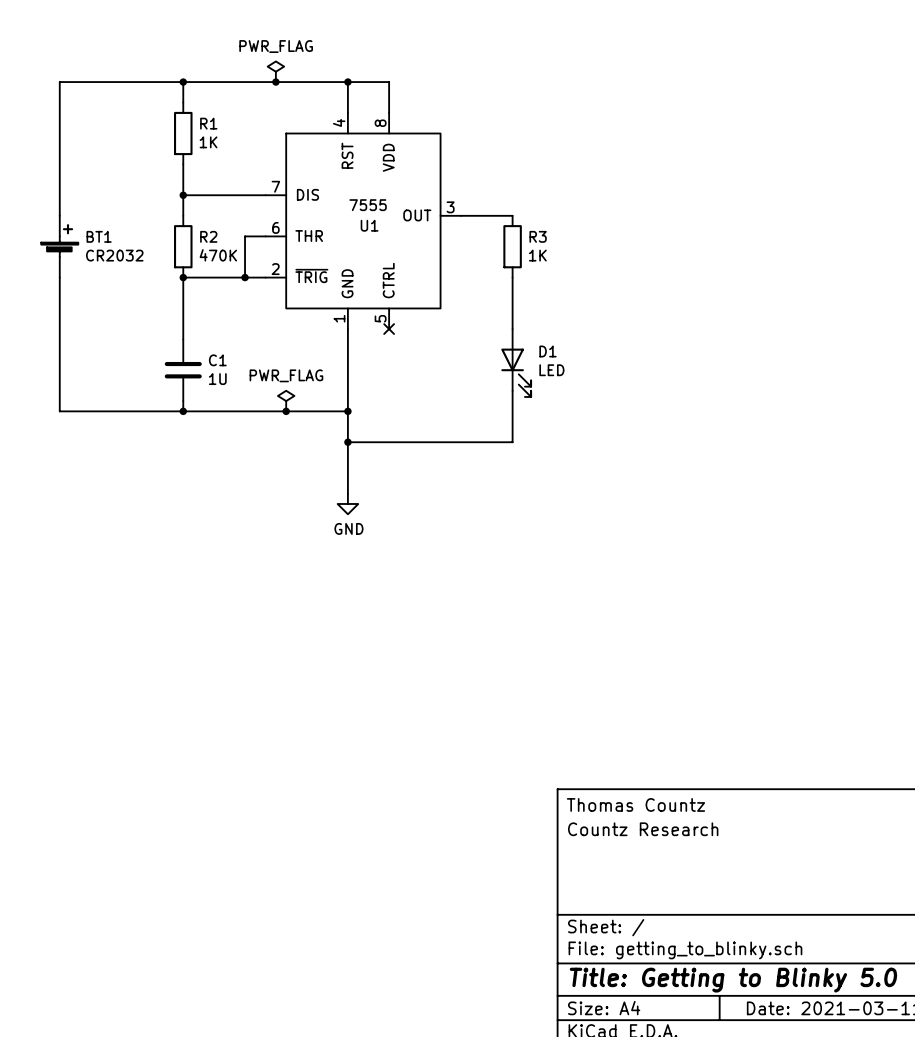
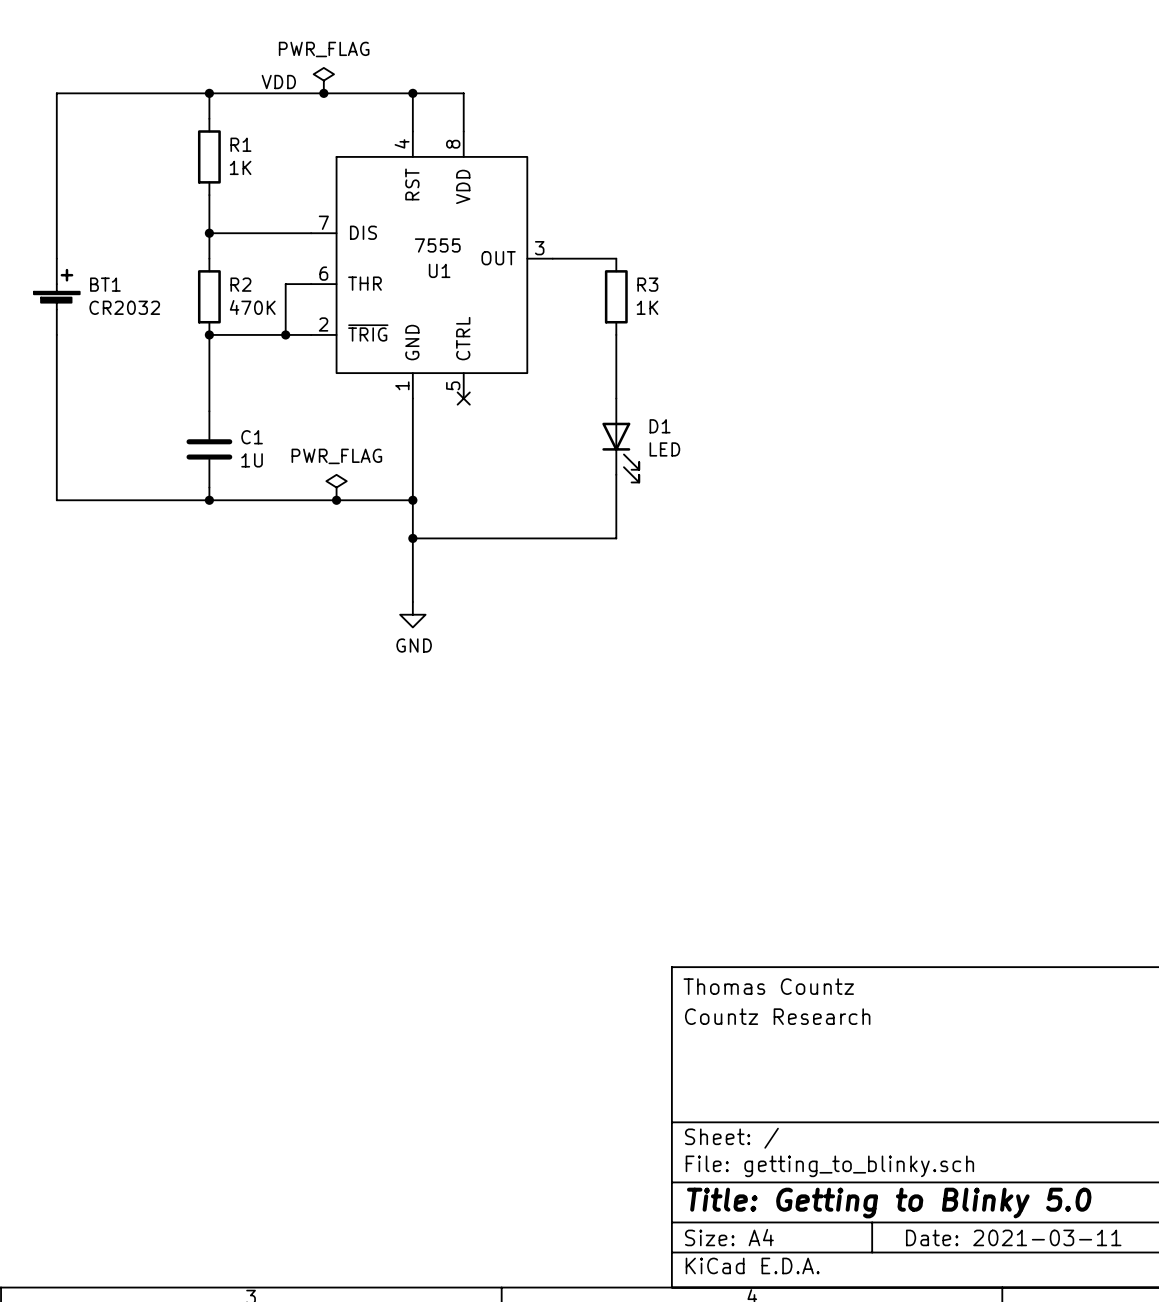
label: none -> VDD (278, 82)

